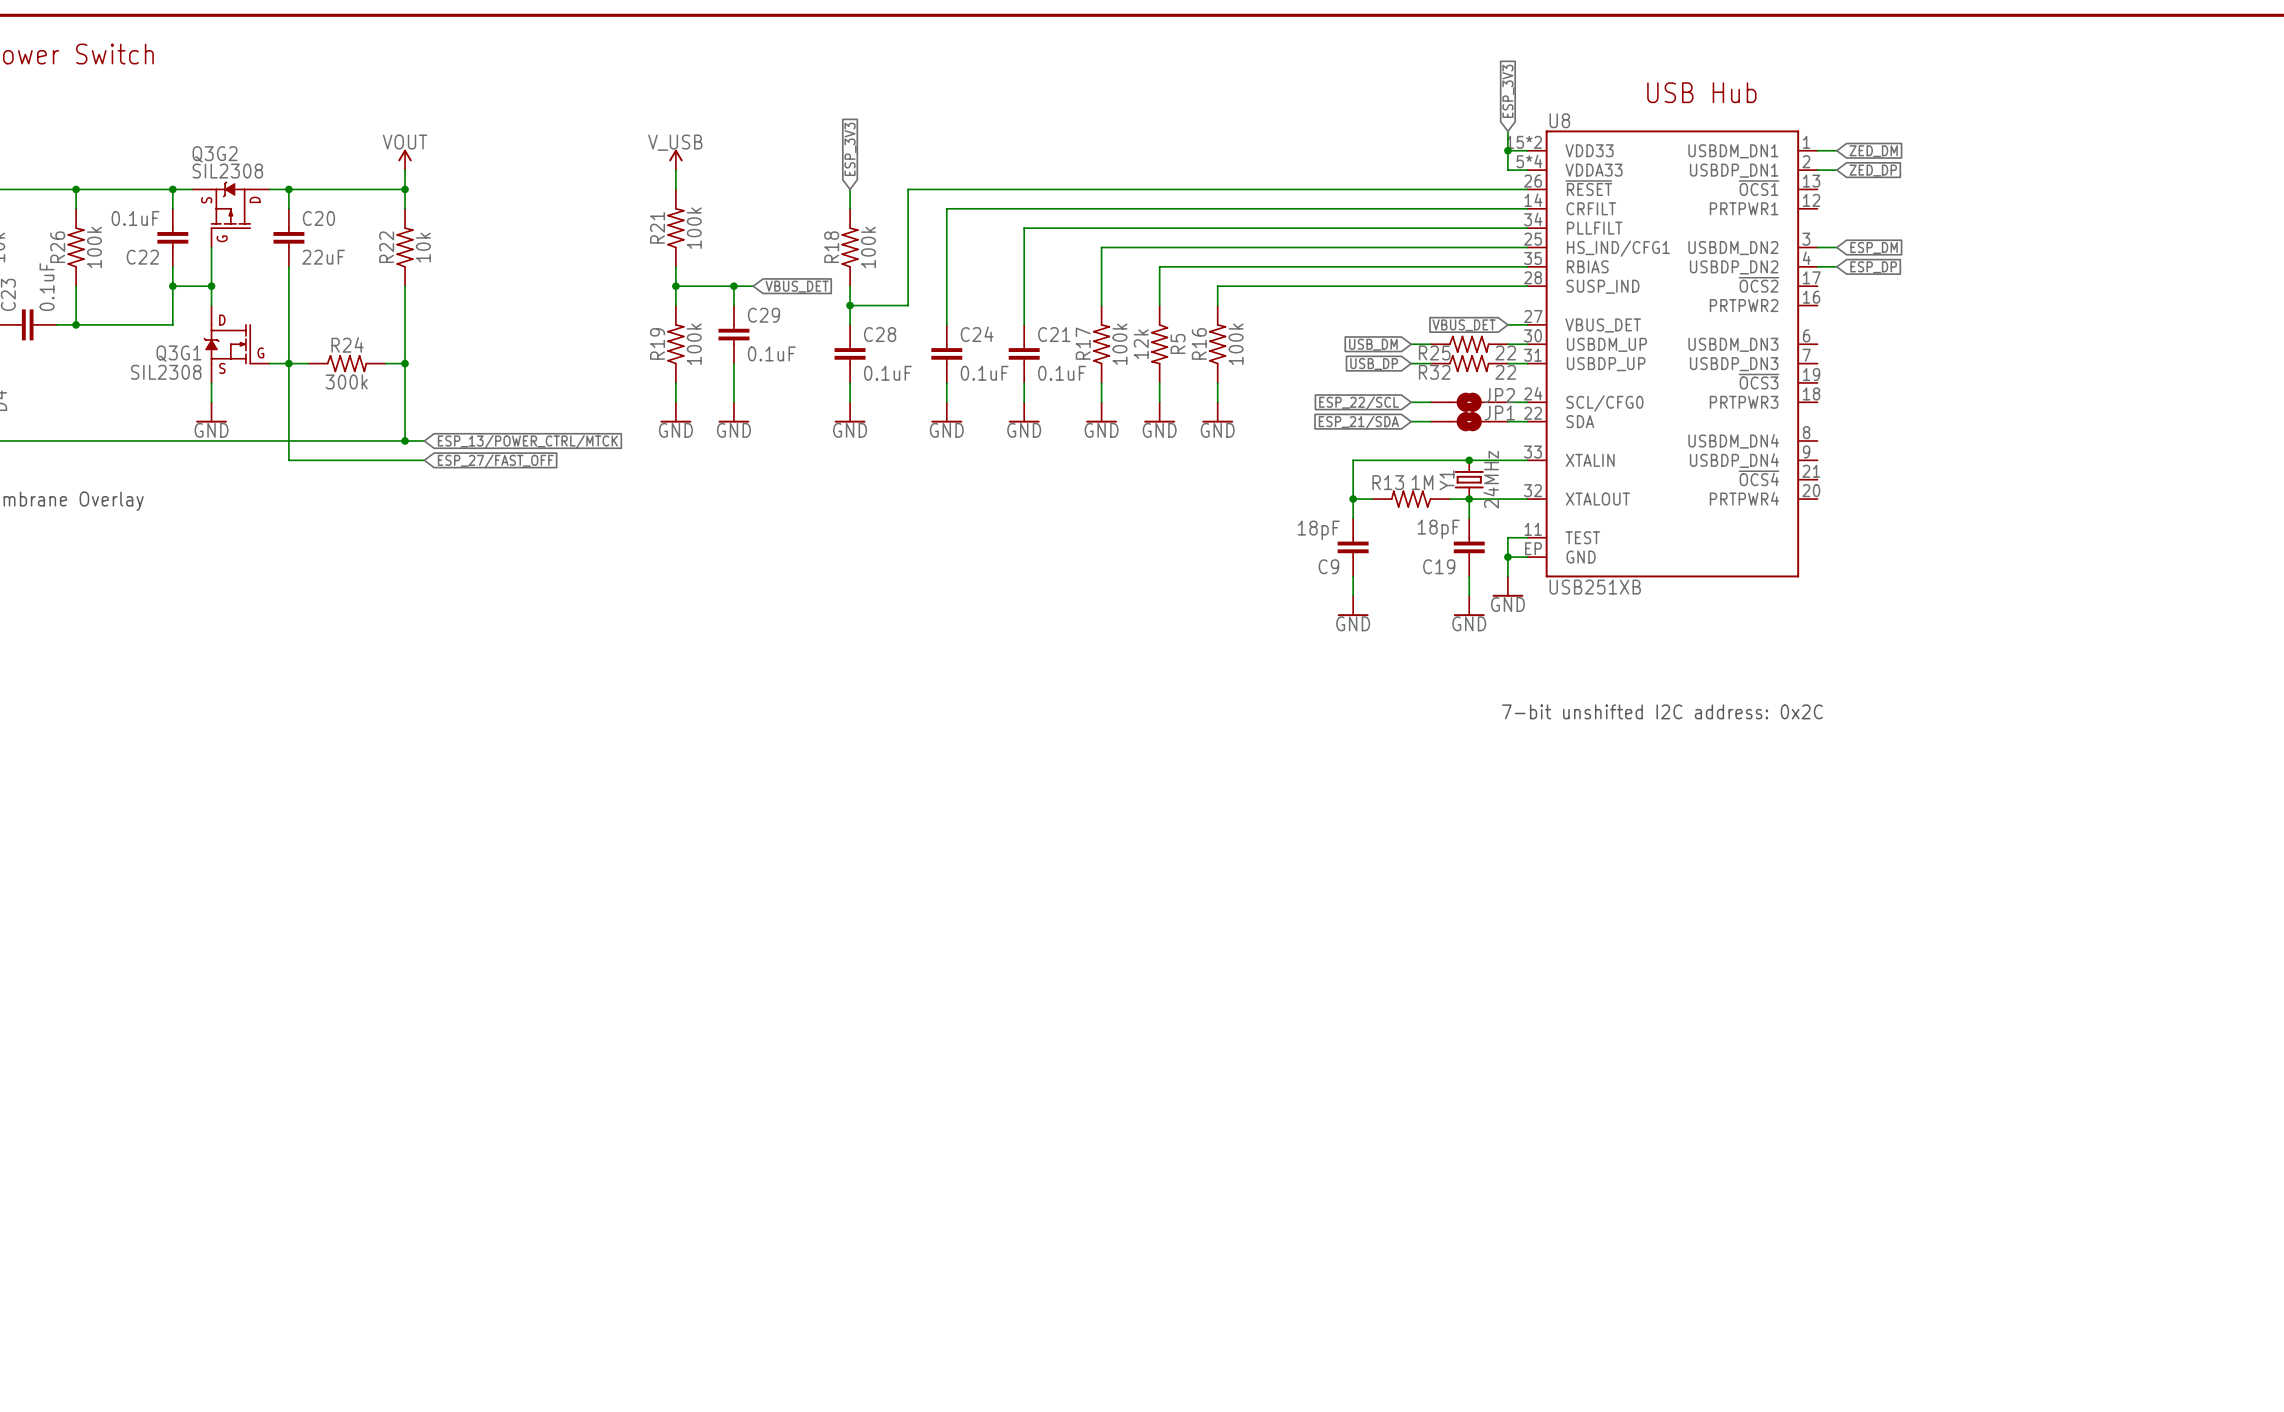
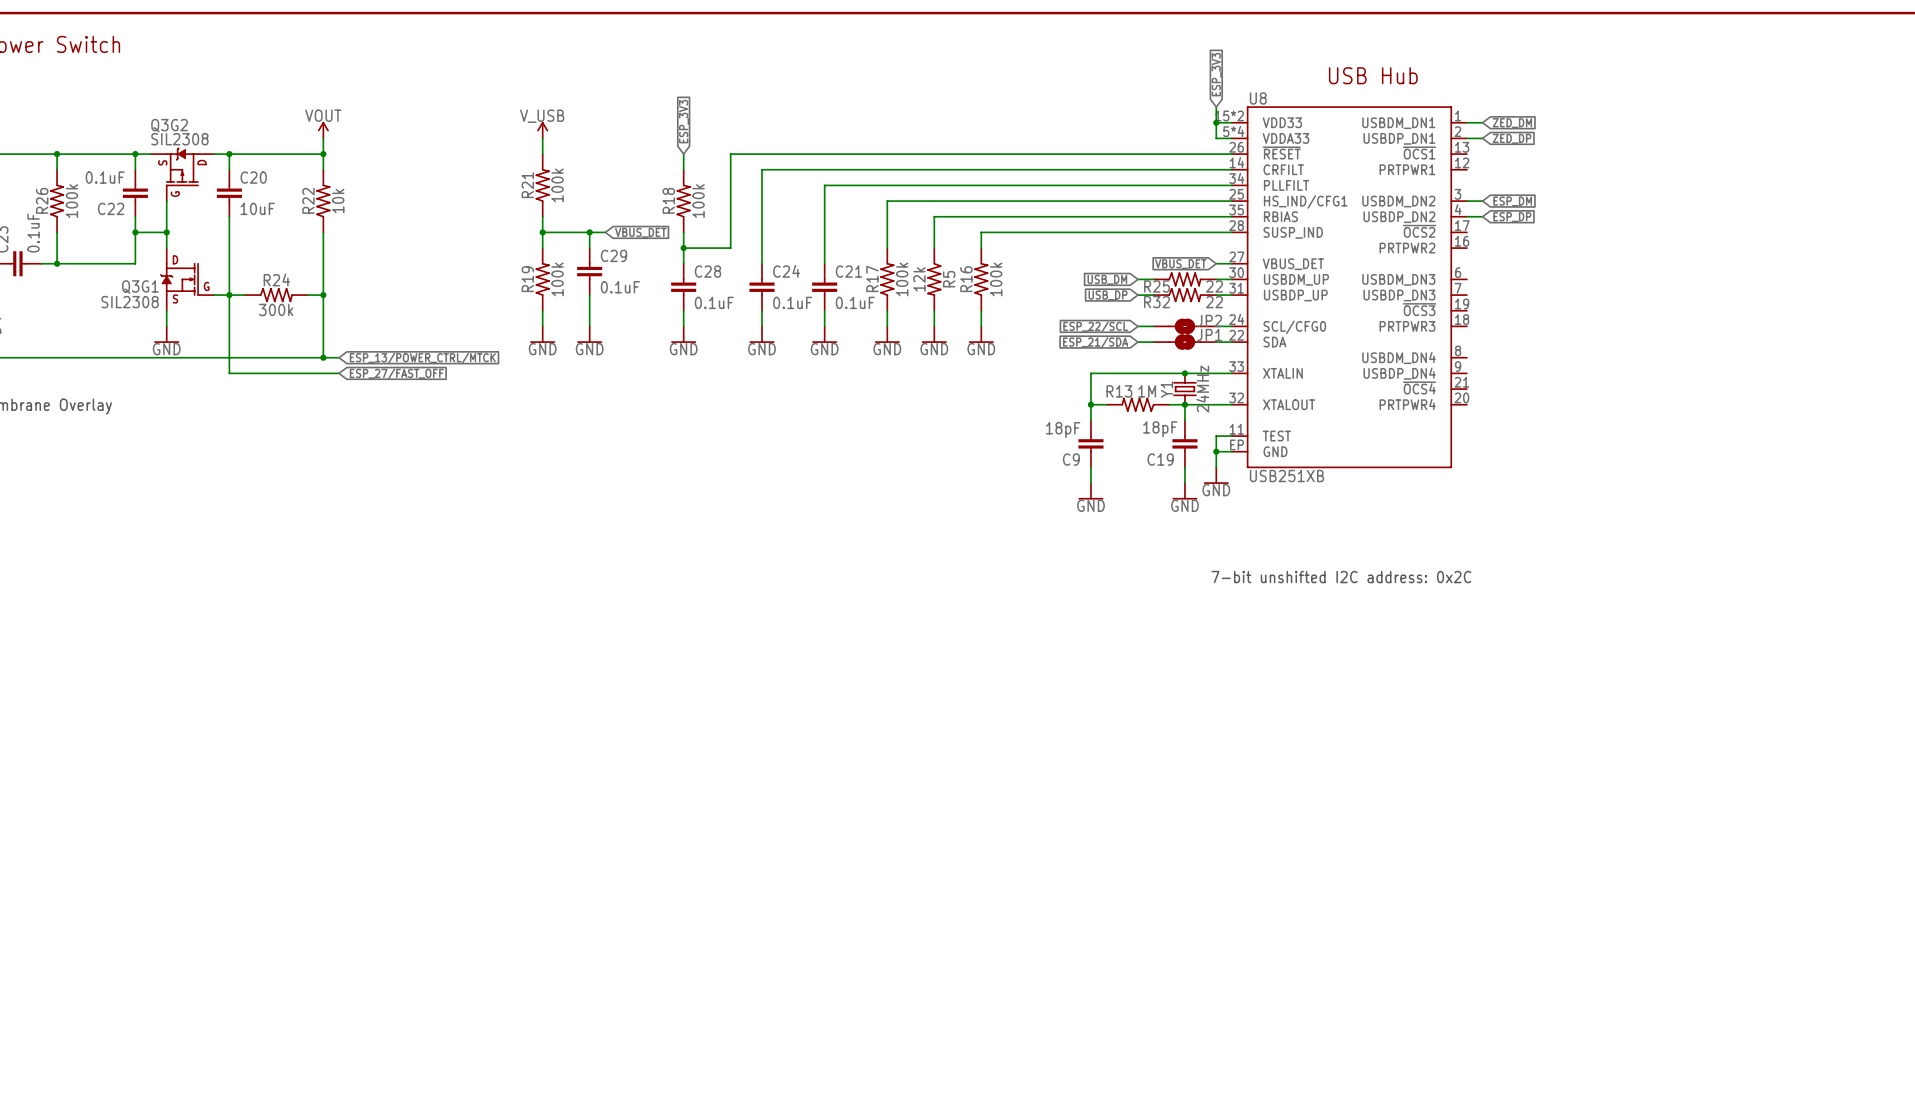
C20 value: 22uF (323, 257) -> 10uF (257, 208)

